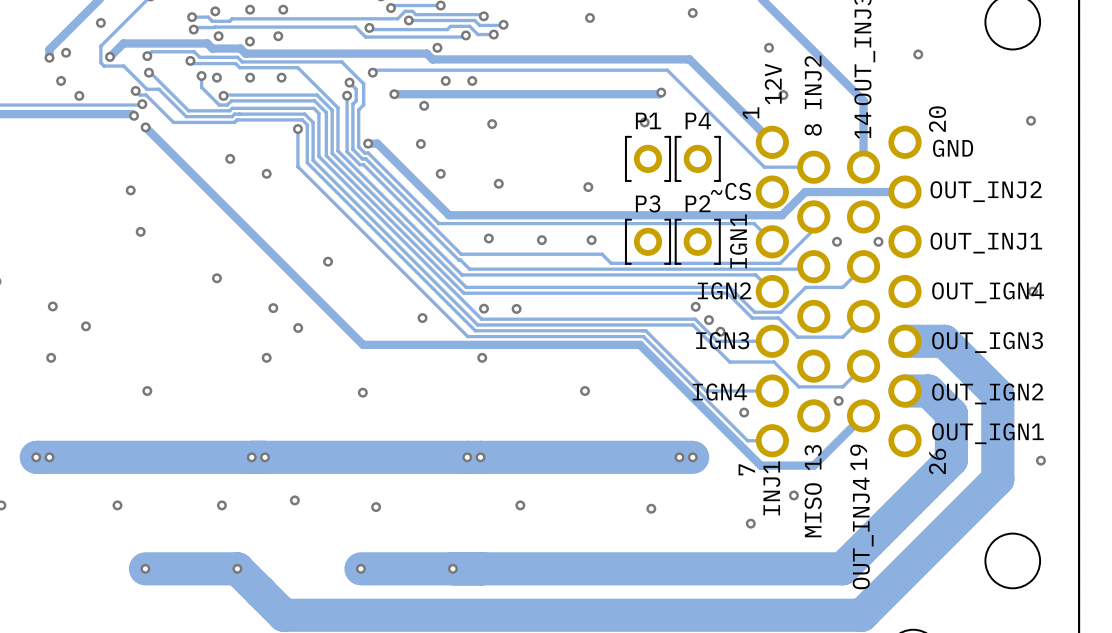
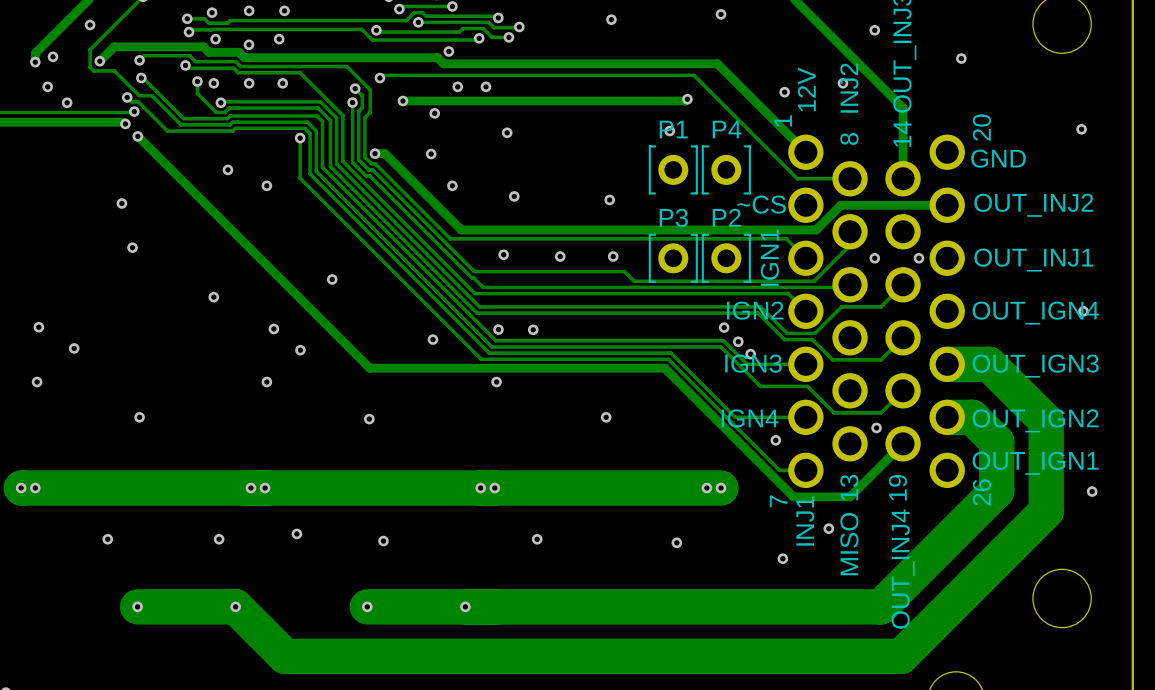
via: none -> (874, 30)
via: (769, 47) -> none
via: none -> (842, 83)
via: none -> (784, 92)
via: (783, 95) -> none

